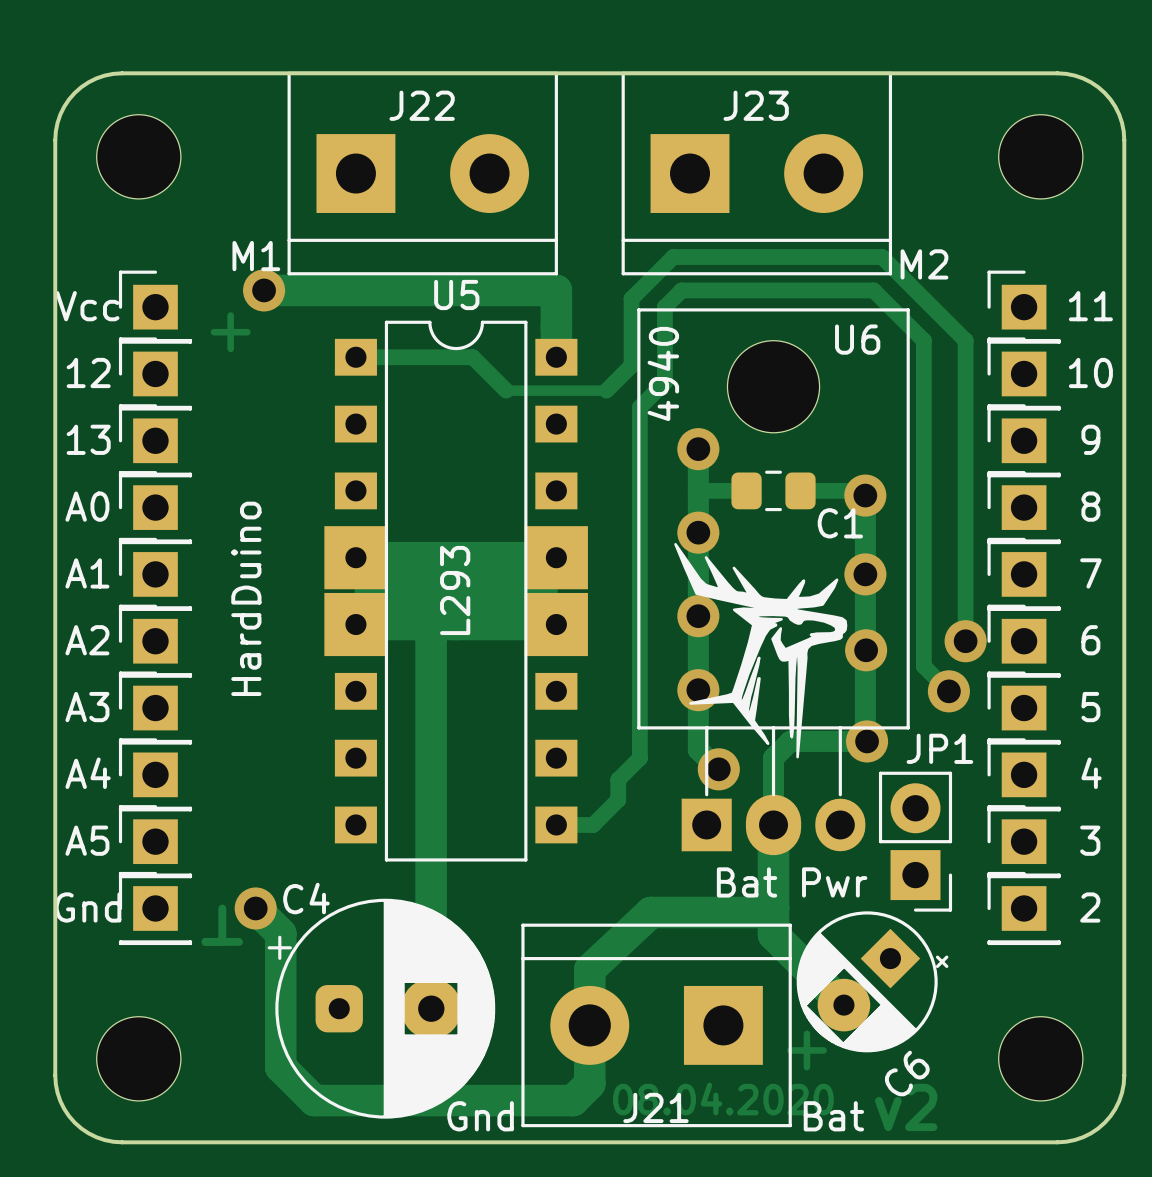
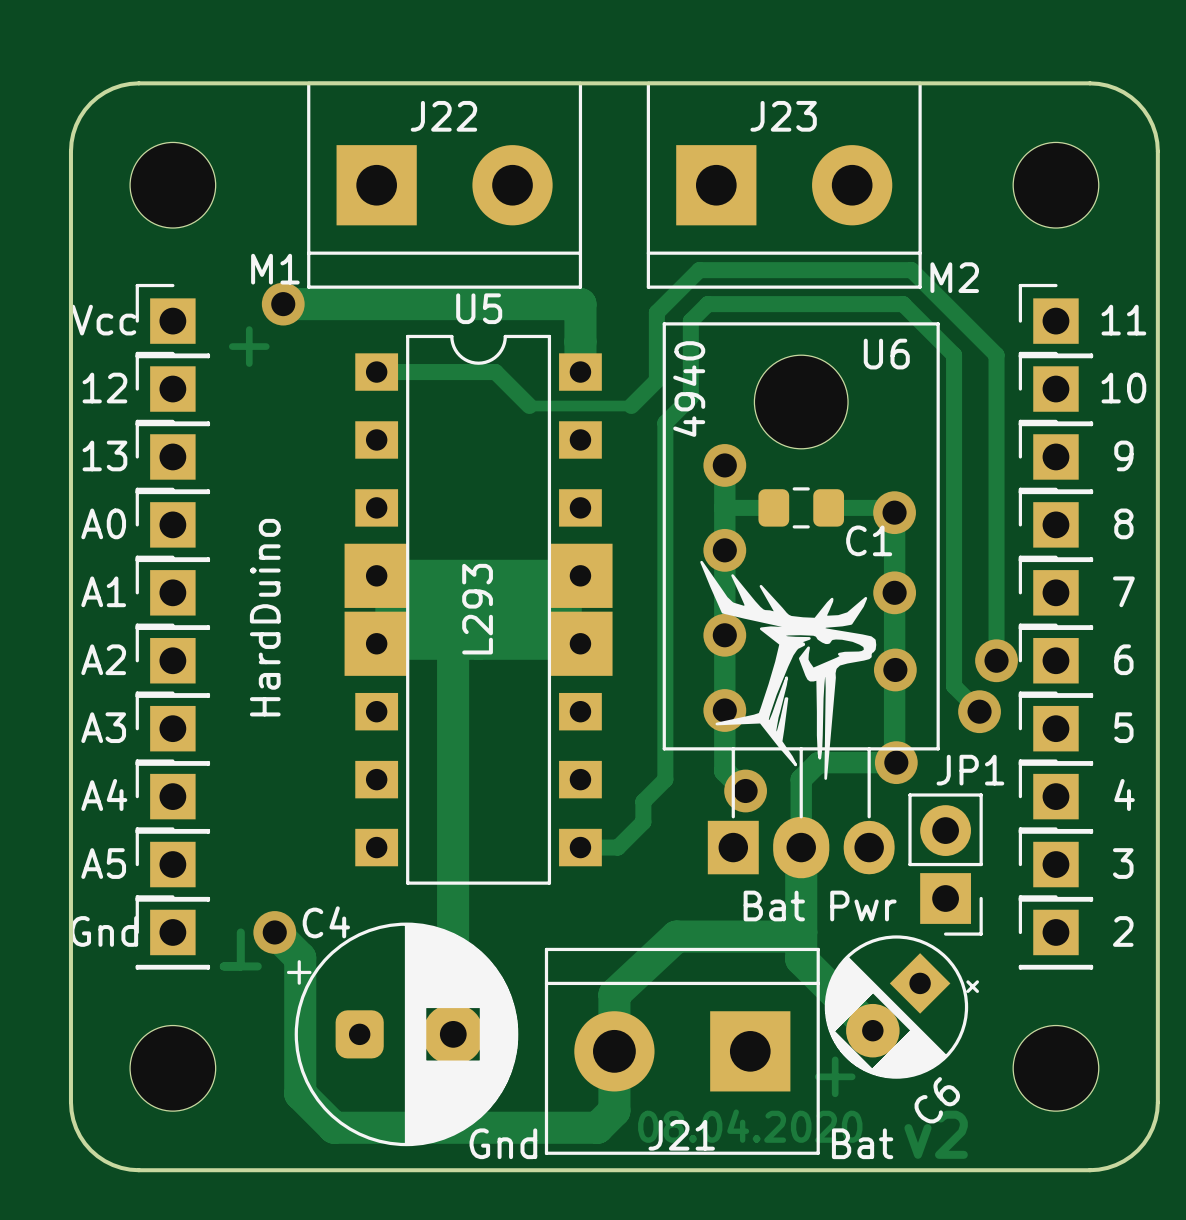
part position: (138, 156) -> (172, 185)
part position: (1040, 156) -> (1055, 185)
part position: (138, 1058) -> (172, 1068)
part position: (1040, 1058) -> (1055, 1068)

